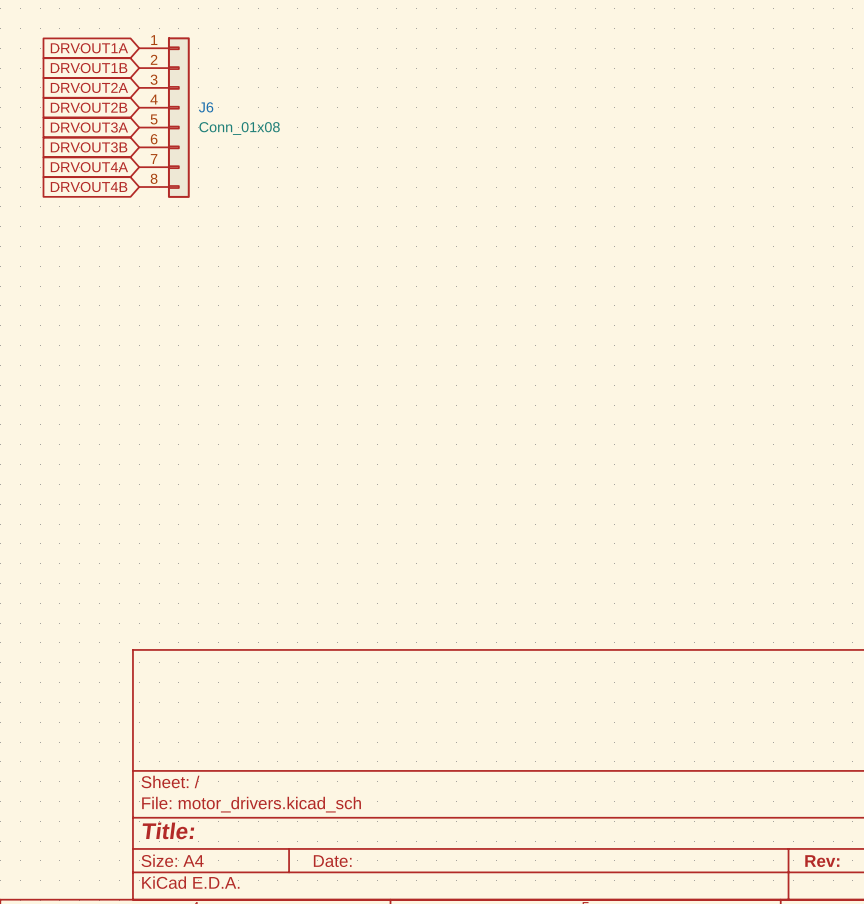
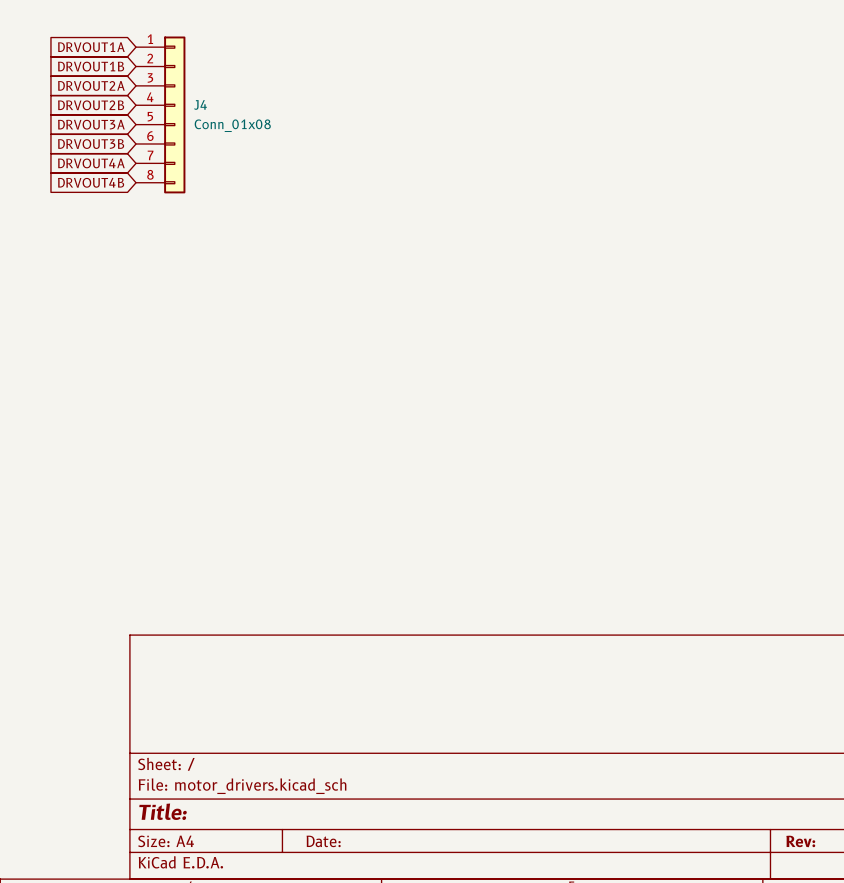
J6 name: J6 (206, 107) -> J4 (200, 104)

